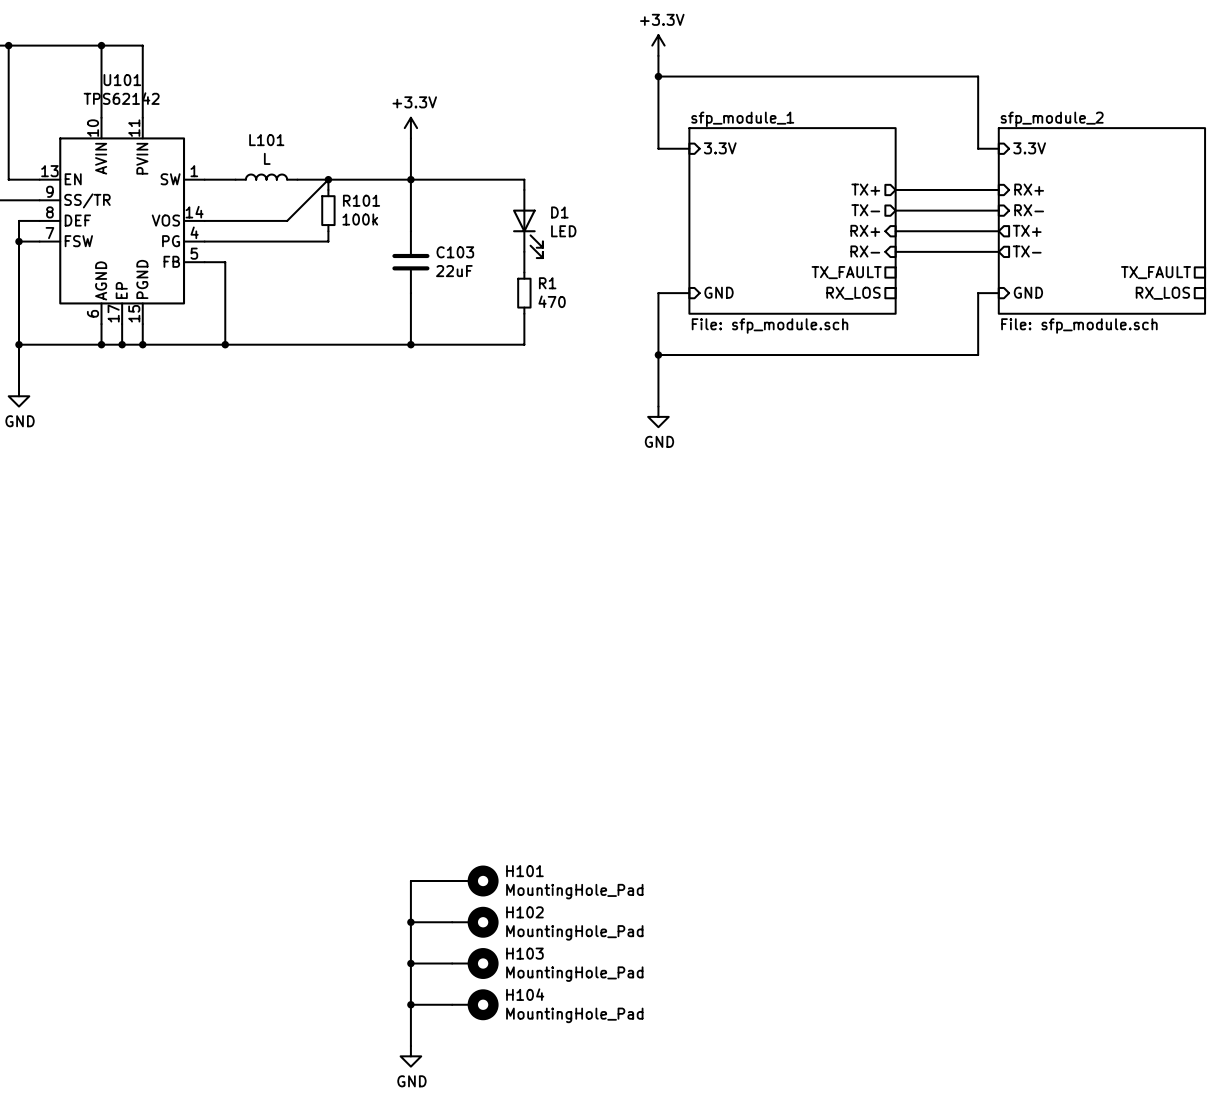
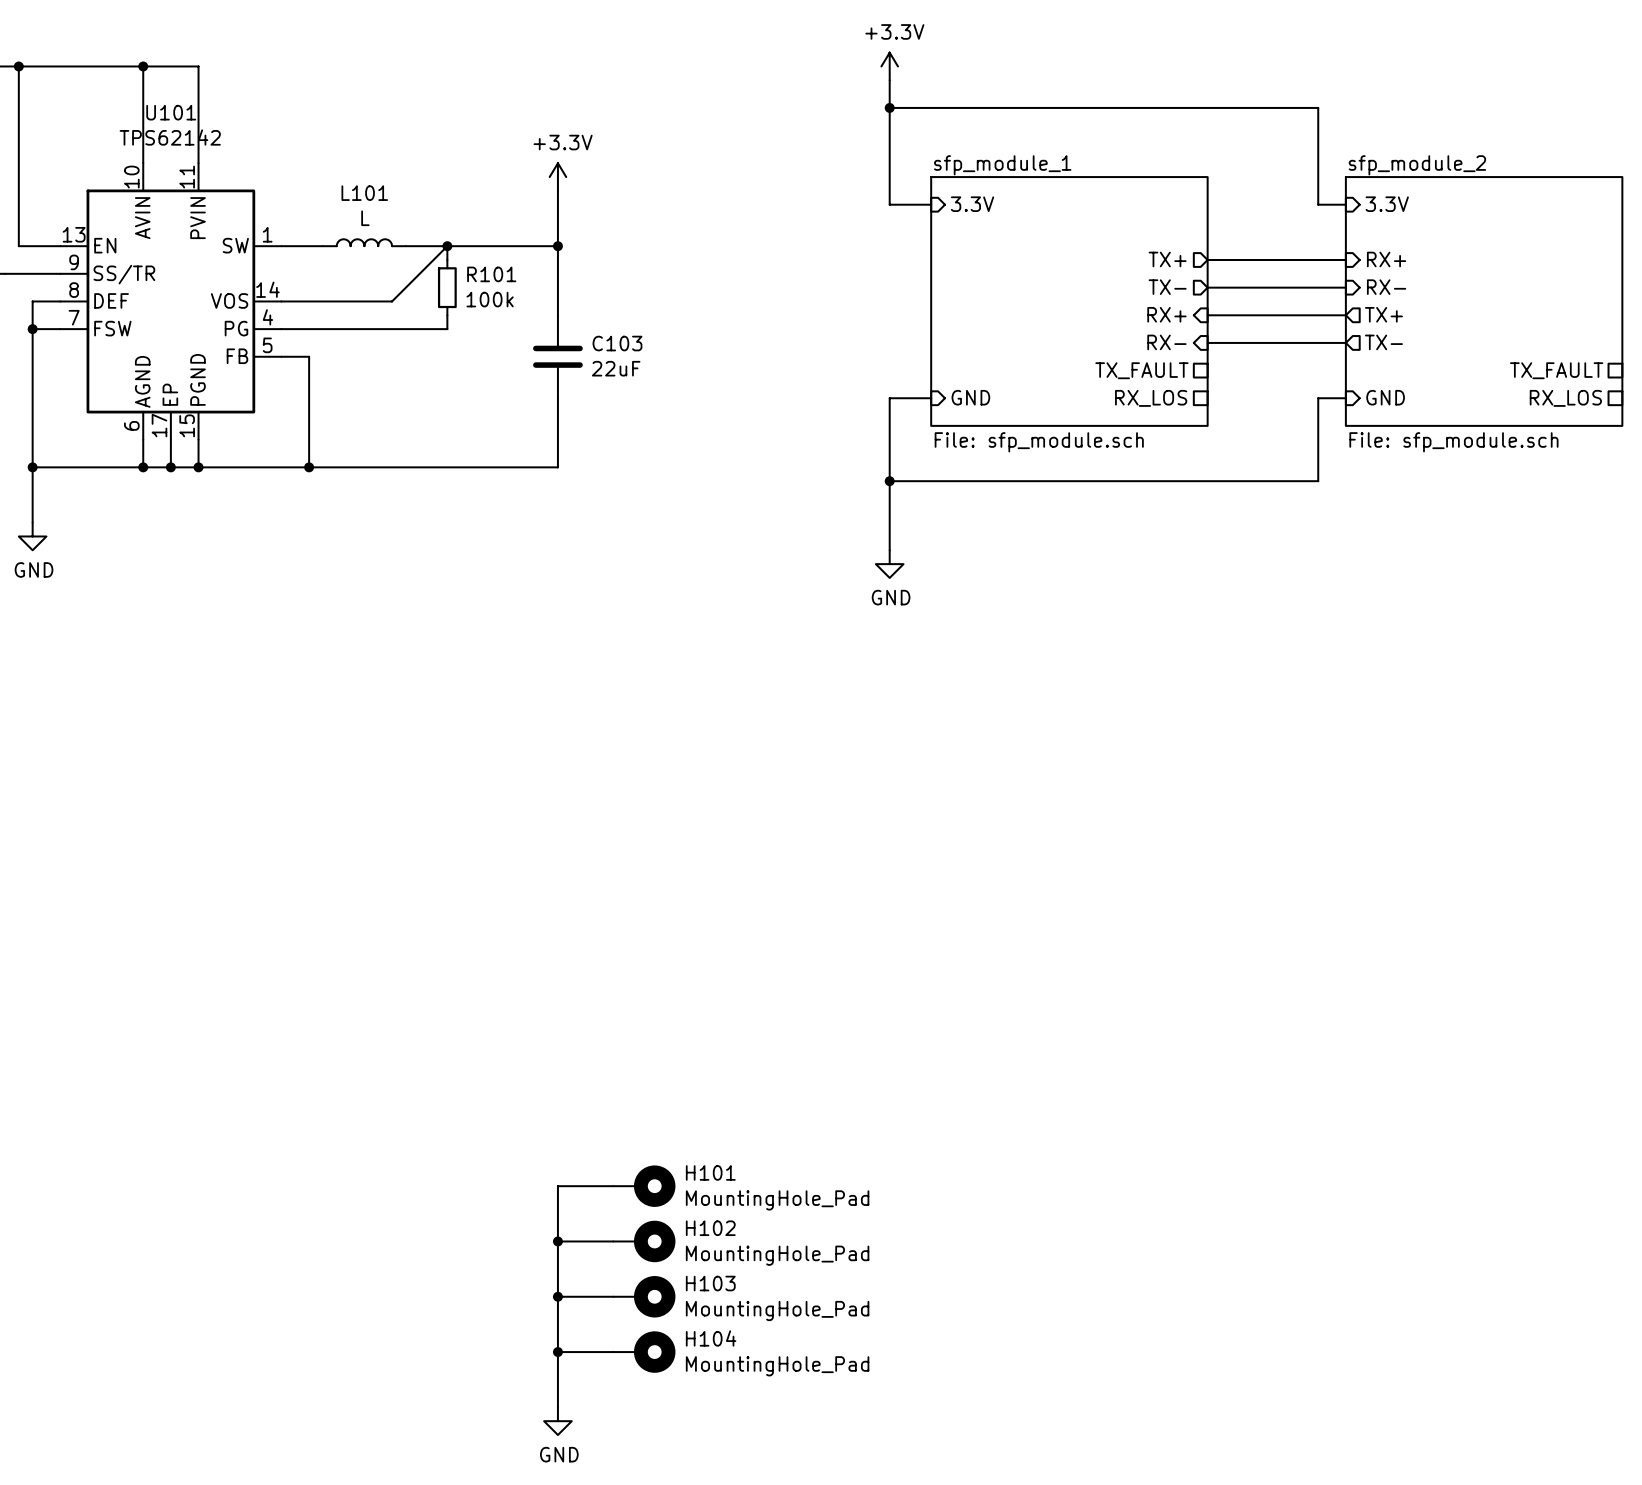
wire: (410, 179) (524, 179) (524, 189) -> none
D1: LED (527, 224) -> none
wire: (524, 251) (524, 272) -> none
R1: 470 (524, 293) -> none
wire: (524, 313) (524, 344) (410, 344) -> none
junction: (410, 344) -> none

